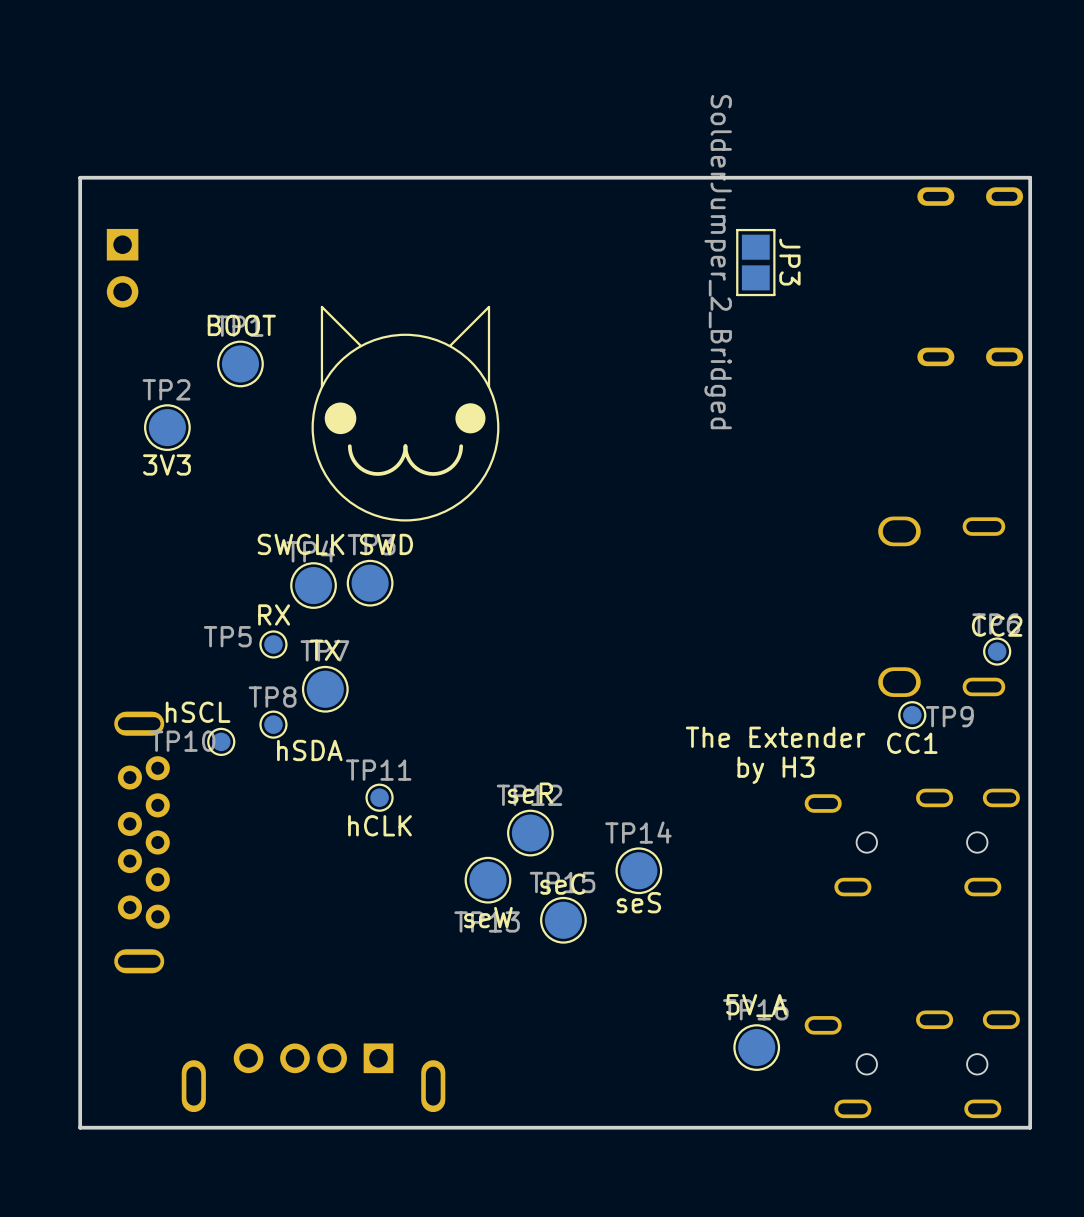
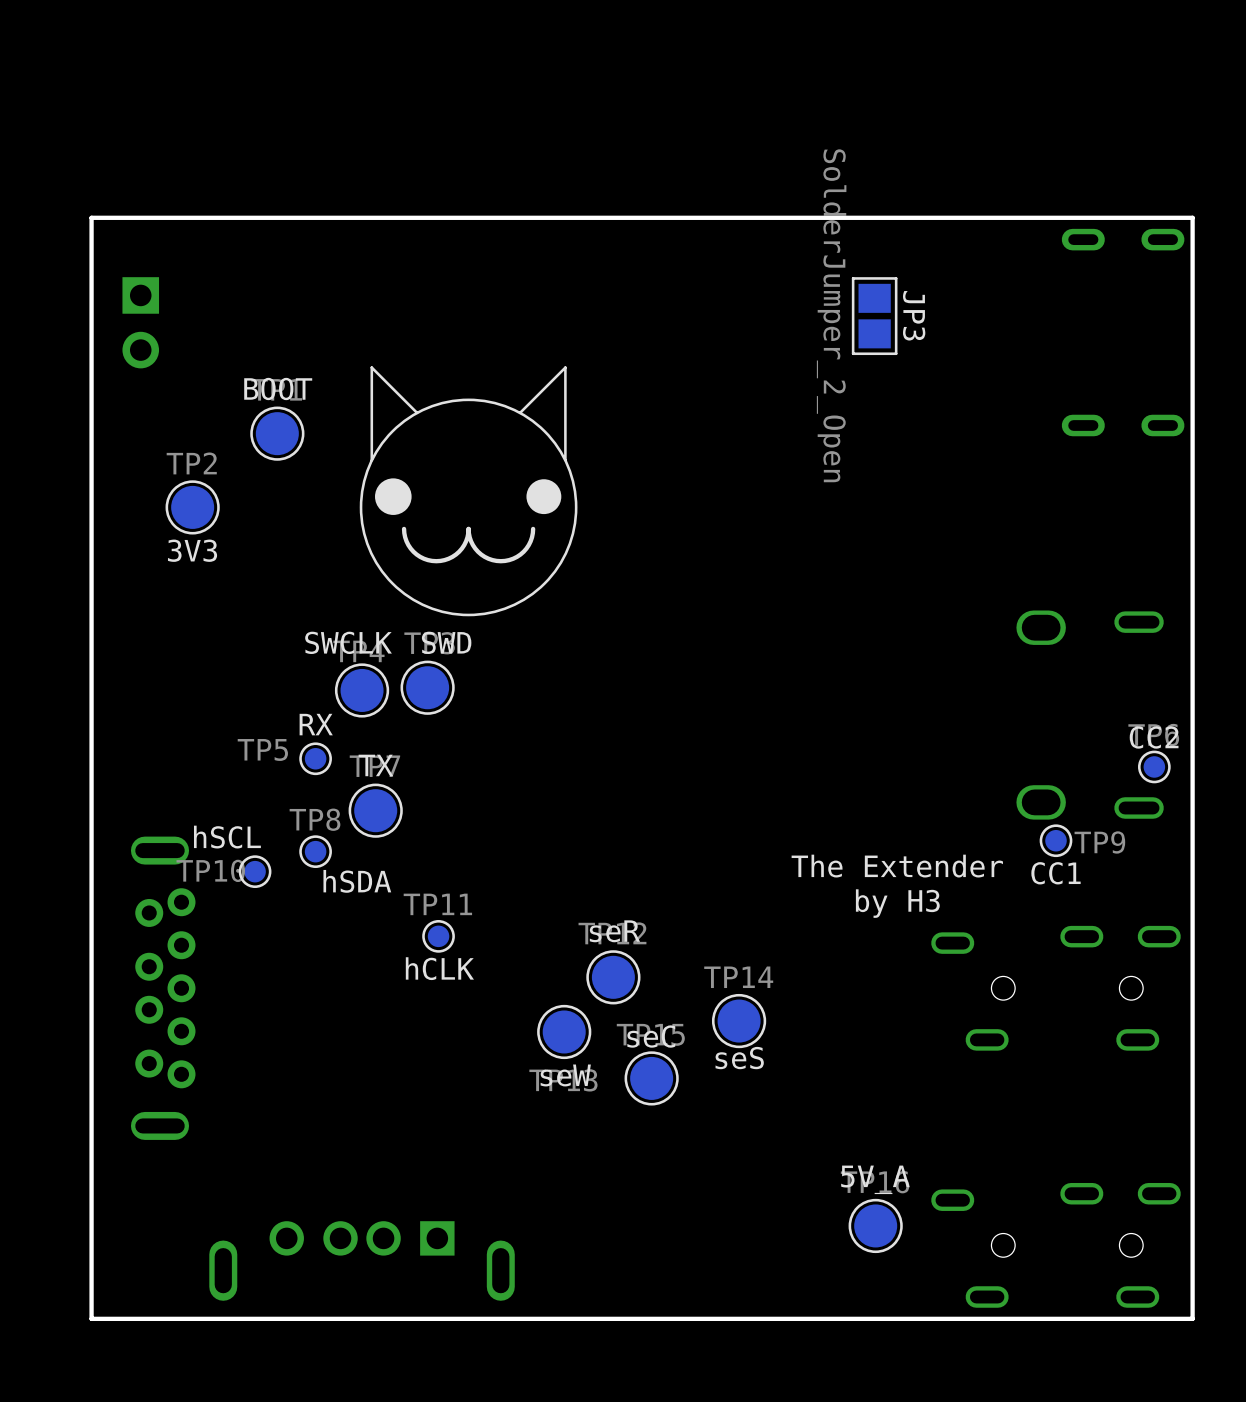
JP3 value: SolderJumper_2_Bridged (718, 262) -> SolderJumper_2_Open (831, 315)

